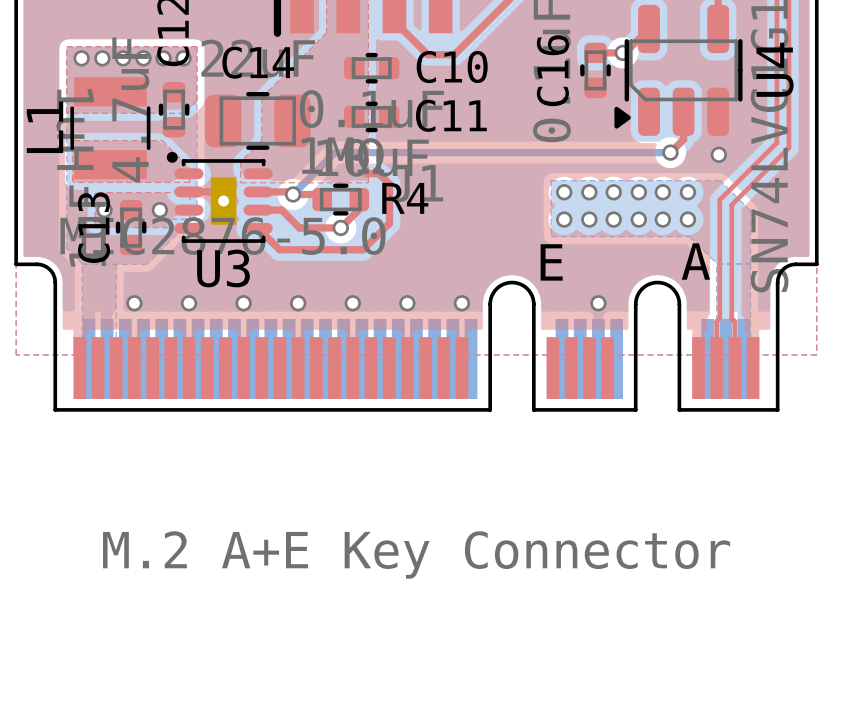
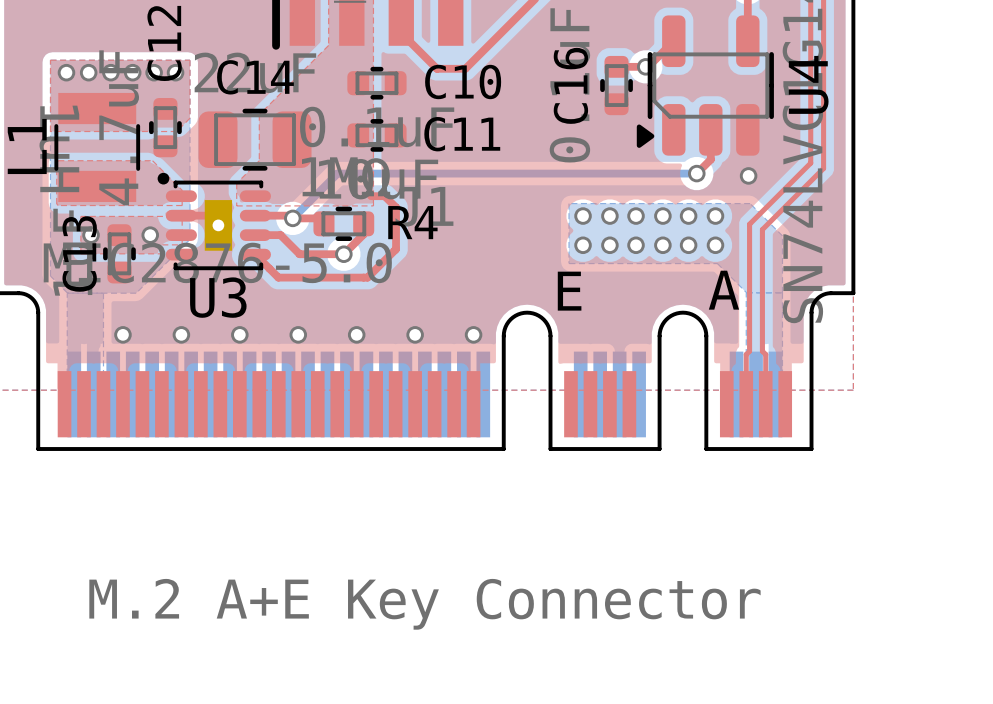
via: (598, 303) -> none

